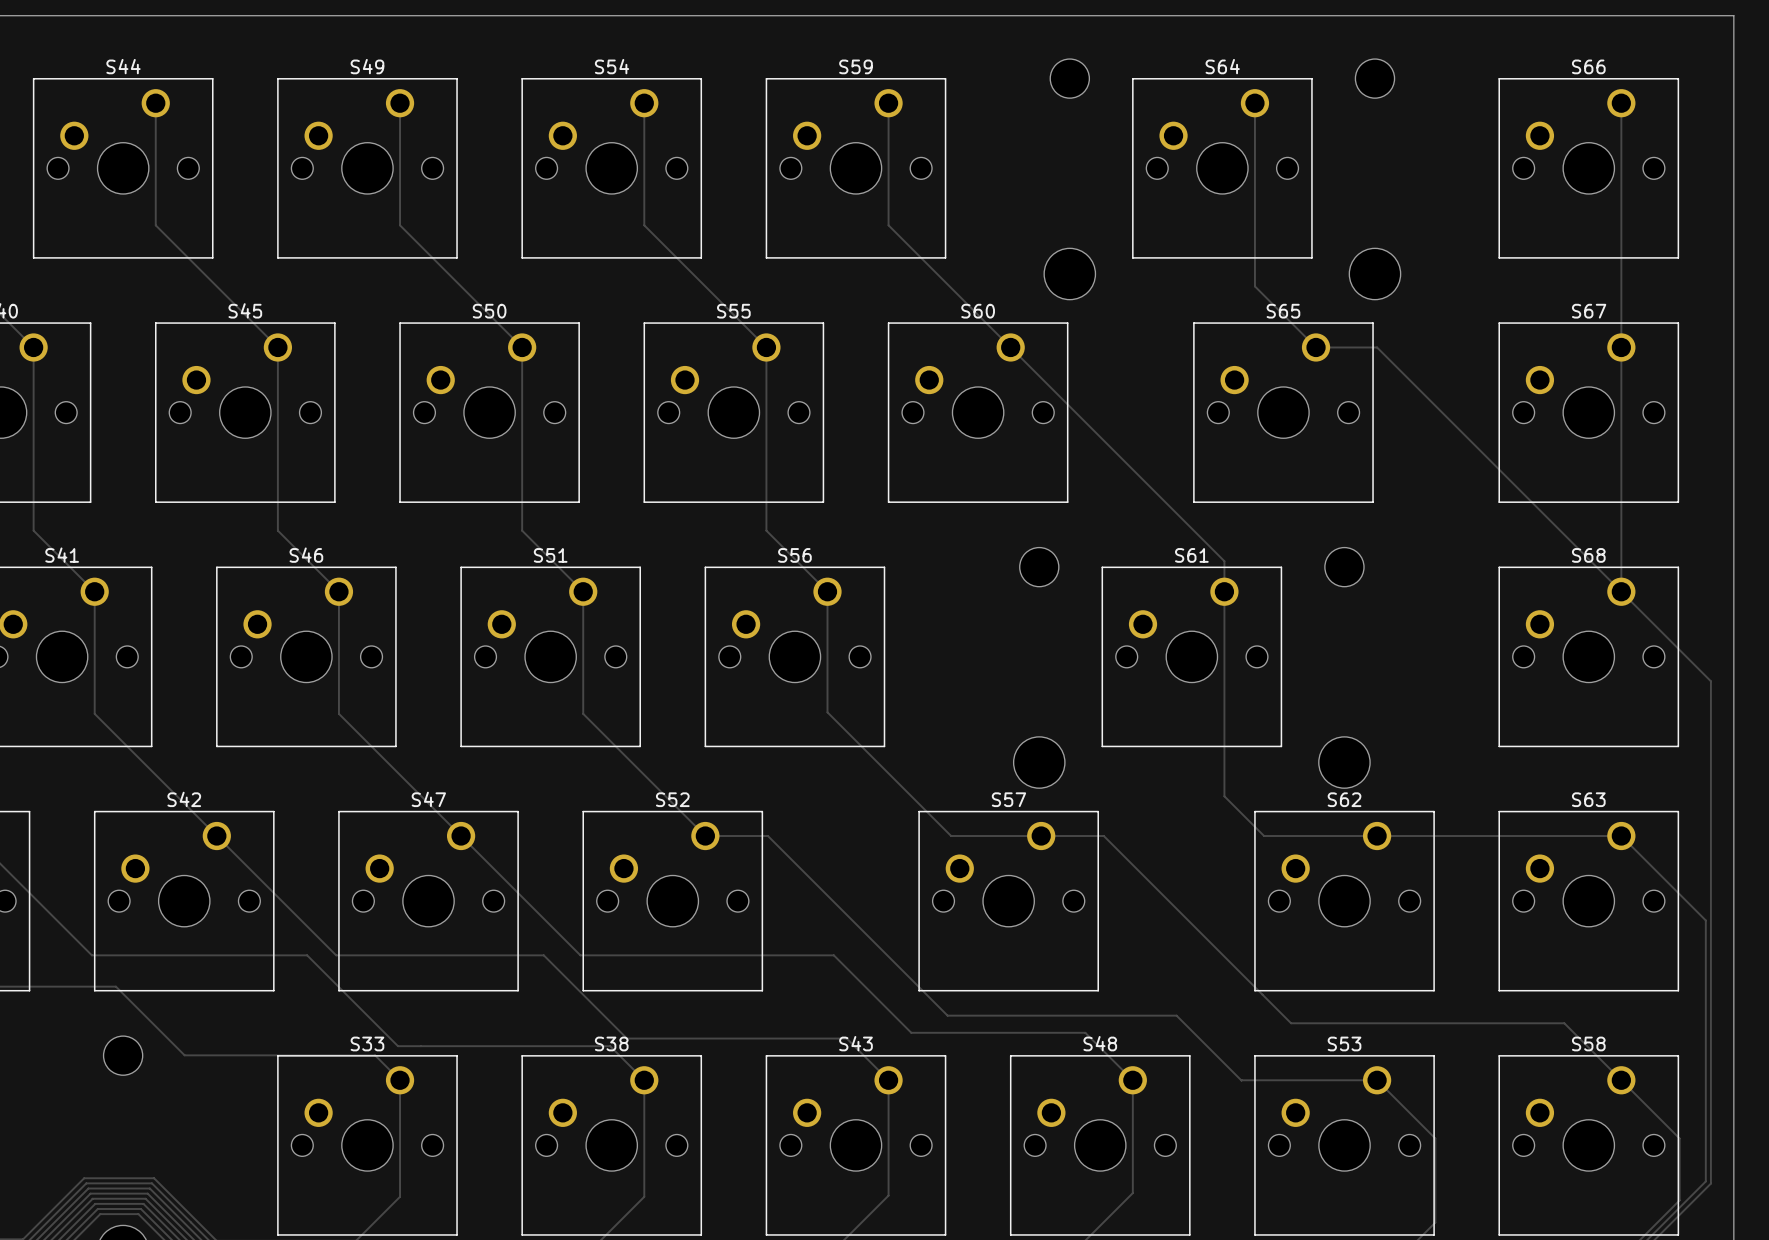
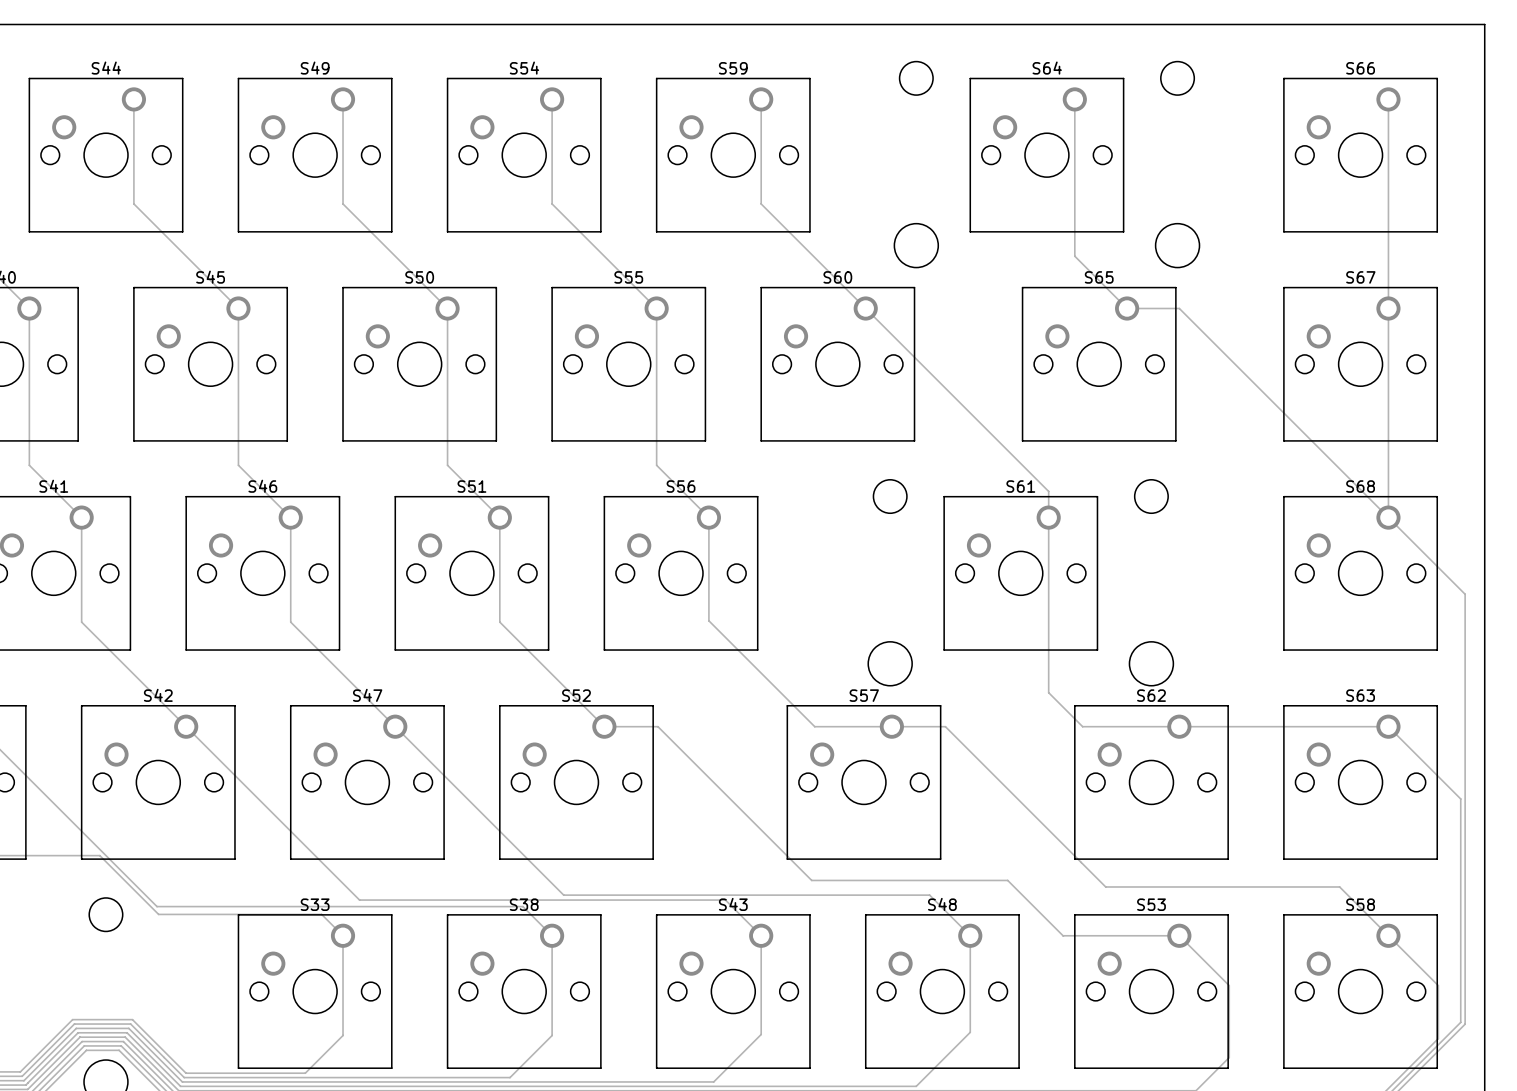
track: (91, 955) (307, 955) (398, 1046) -> (79, 828) (157, 906) (341, 906)
track: (336, 955) (543, 955) (627, 1038) -> (288, 828) (359, 900) (537, 900)
track: (580, 955) (833, 955) (911, 1032) -> (497, 828) (563, 895) (780, 895)

